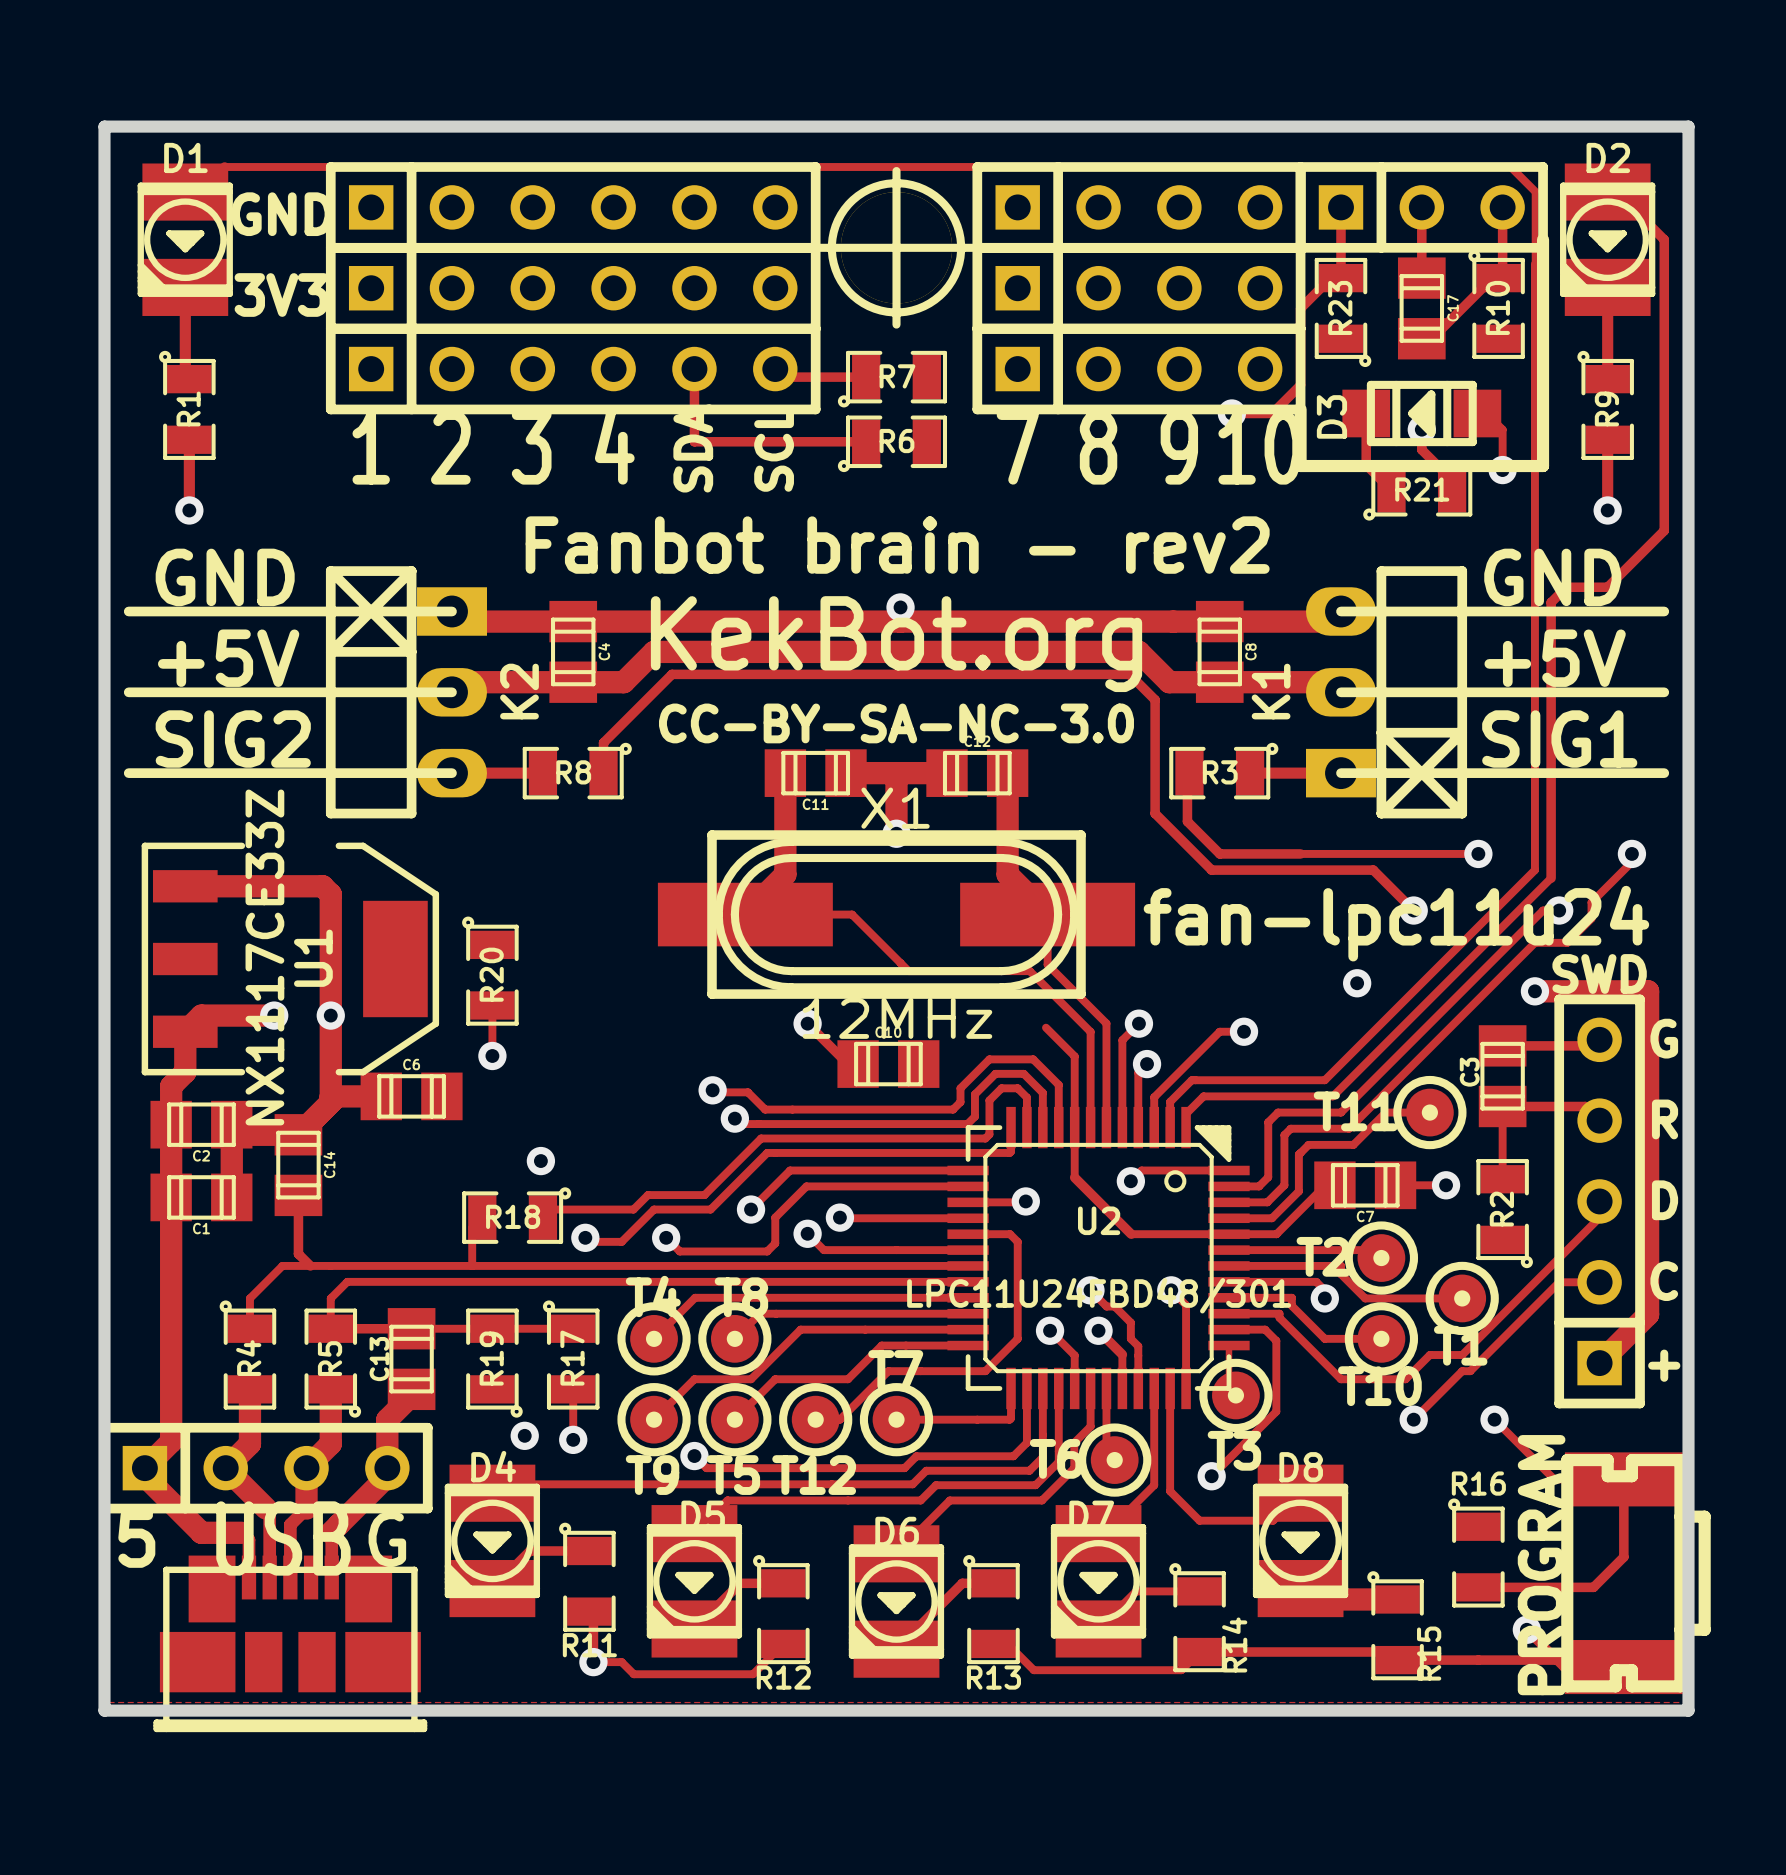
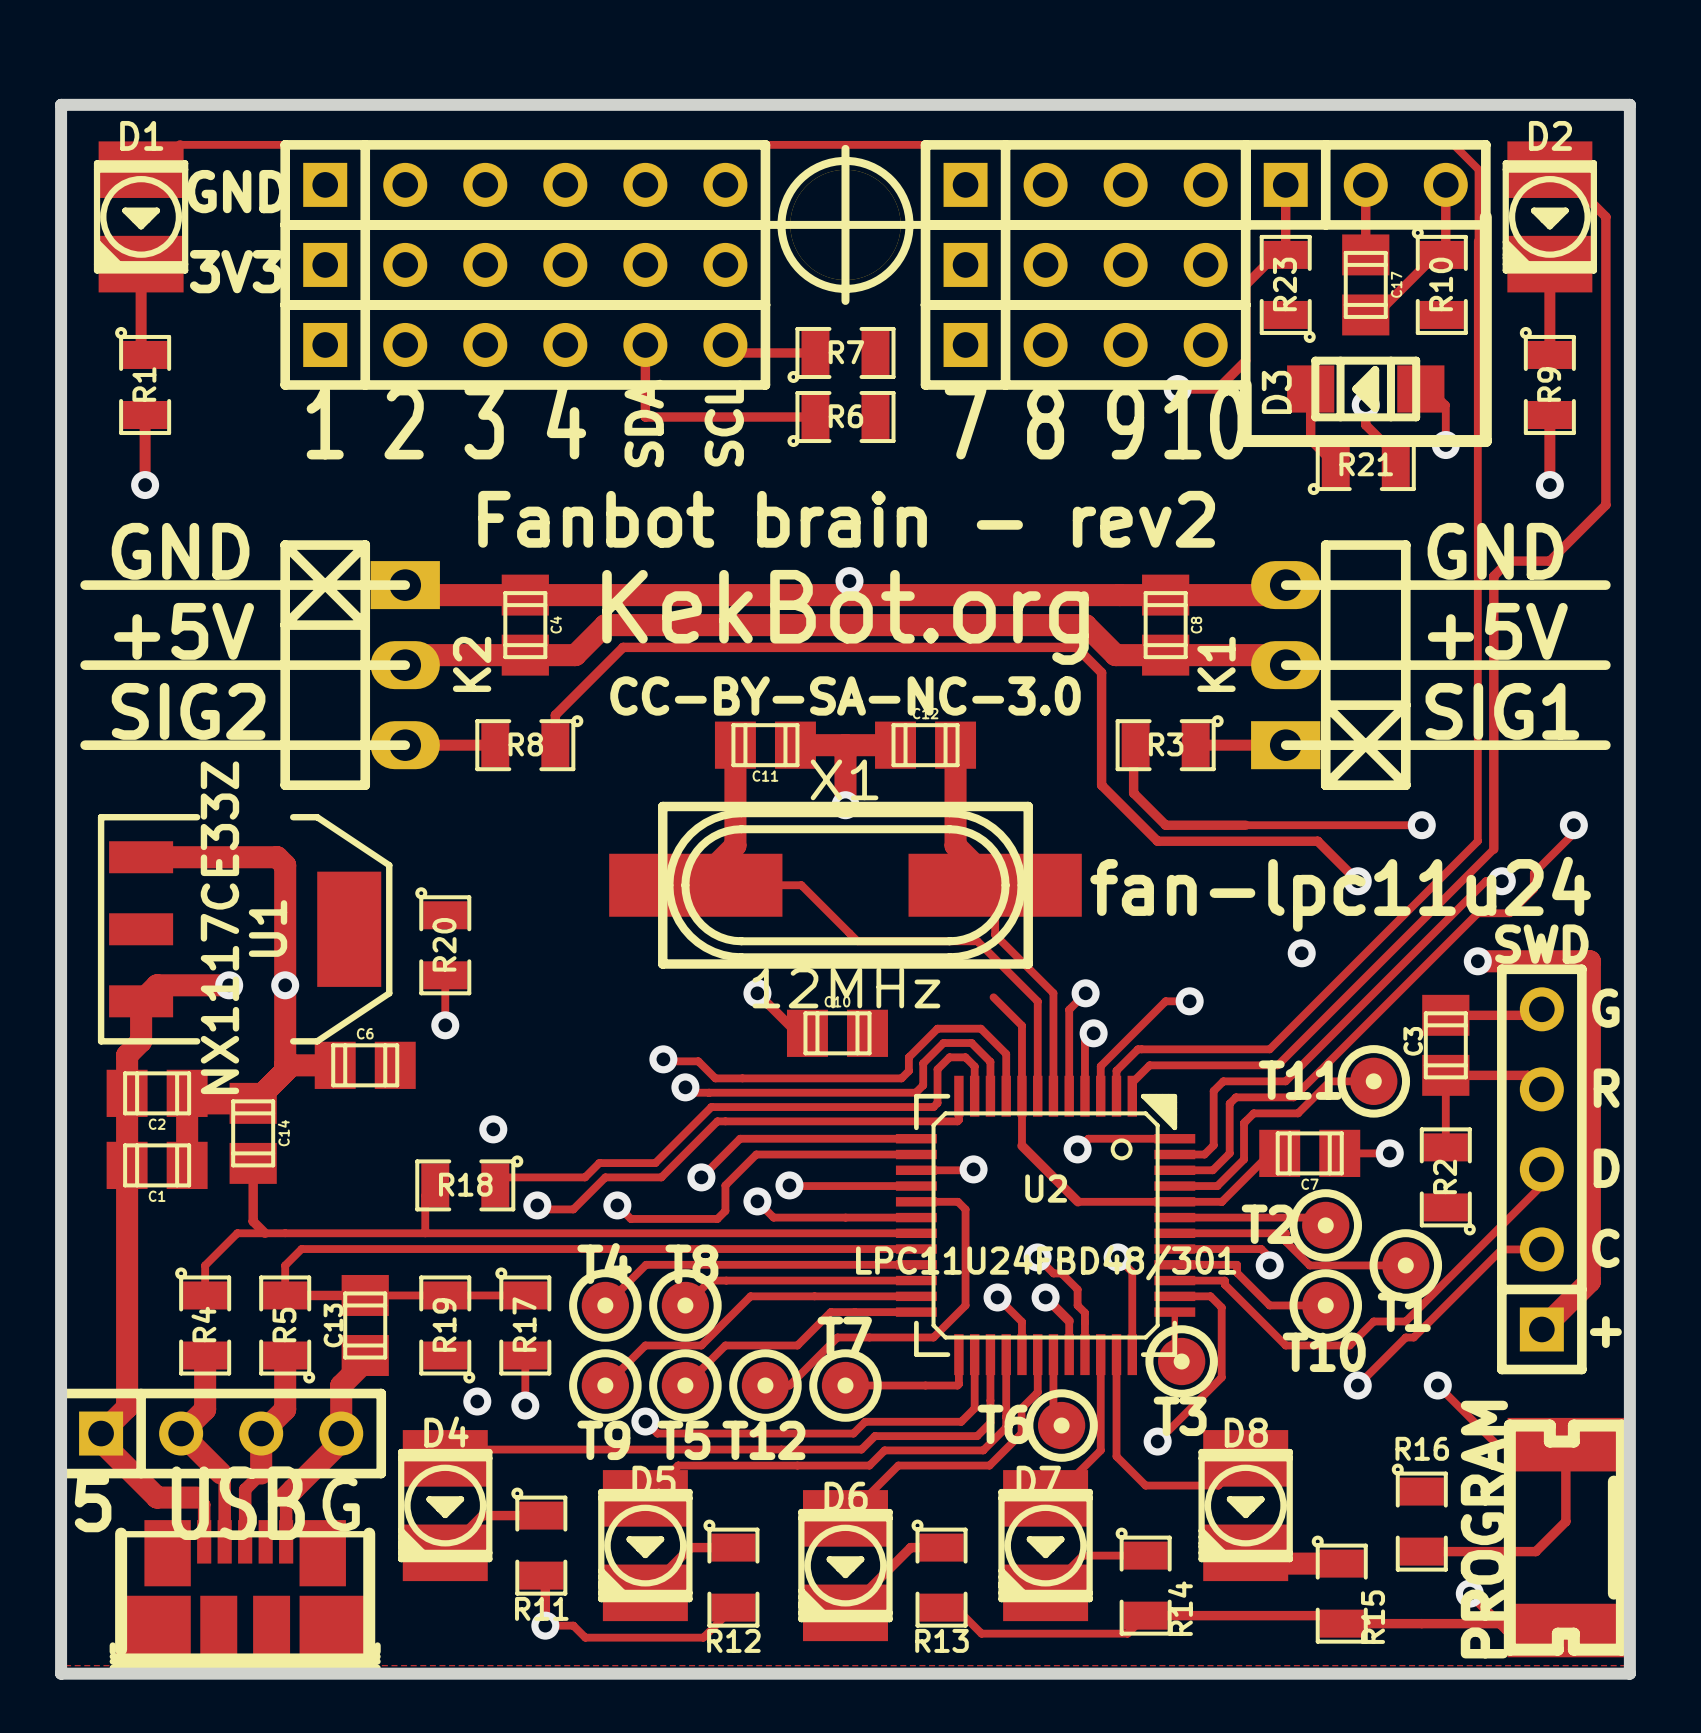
part footprint: [1561, 1452, 1711, 1695] -> [1503, 1417, 1628, 1658]
part footprint: [153, 1555, 428, 1733] -> [109, 1520, 381, 1671]

